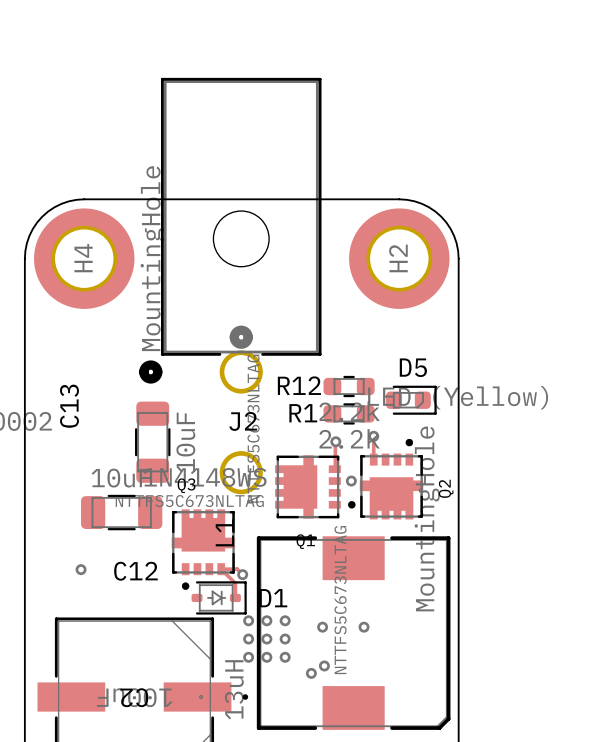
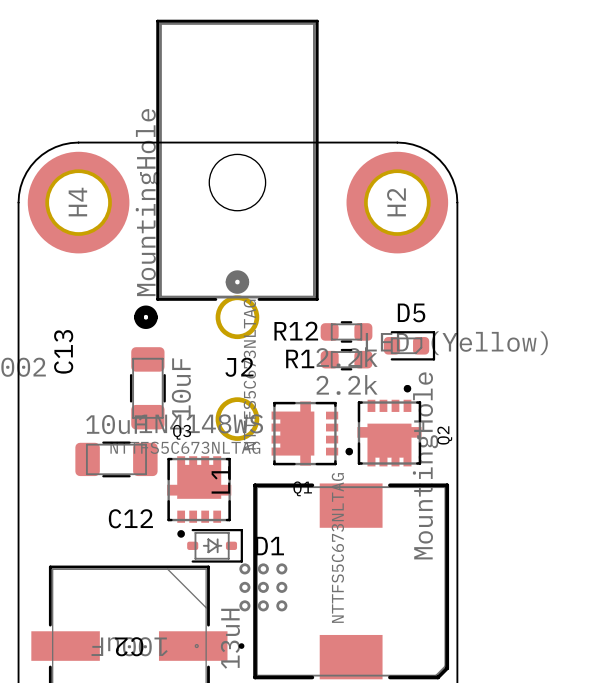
track: (373, 436) (373, 459) -> none
via: (373, 436) -> none
track: (335, 441) (334, 469) -> none
via: (335, 441) -> none
via: (351, 481) -> none
via: (81, 569) -> none
track: (242, 574) (237, 569) (221, 569) (235, 583) (235, 597) -> none
via: (242, 574) -> none
via: (322, 627) -> none
via: (364, 627) -> none
via: (324, 665) -> none
via: (311, 673) -> none

